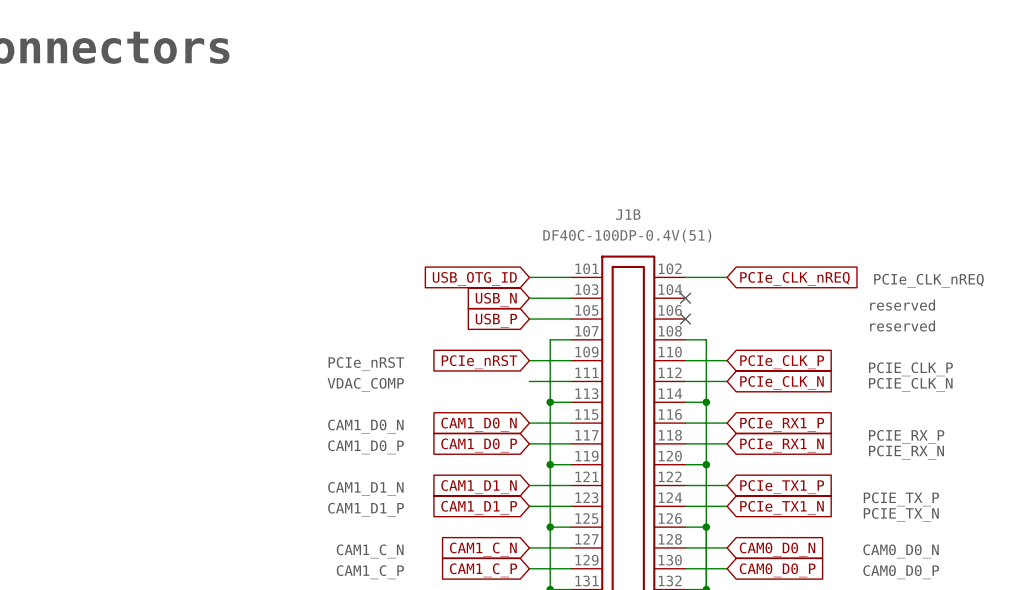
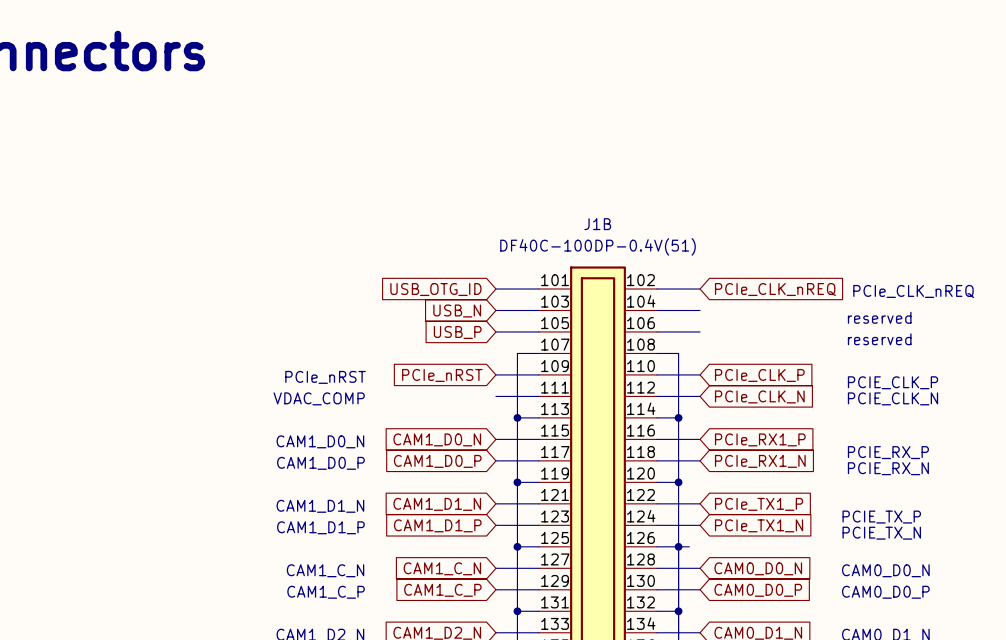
wire: none -> (657, 310) (700, 310)
no-connect mark: (685, 298) -> none
wire: none -> (657, 331) (700, 331)
no-connect mark: (685, 319) -> none
line: none -> (678, 546) (689, 546)

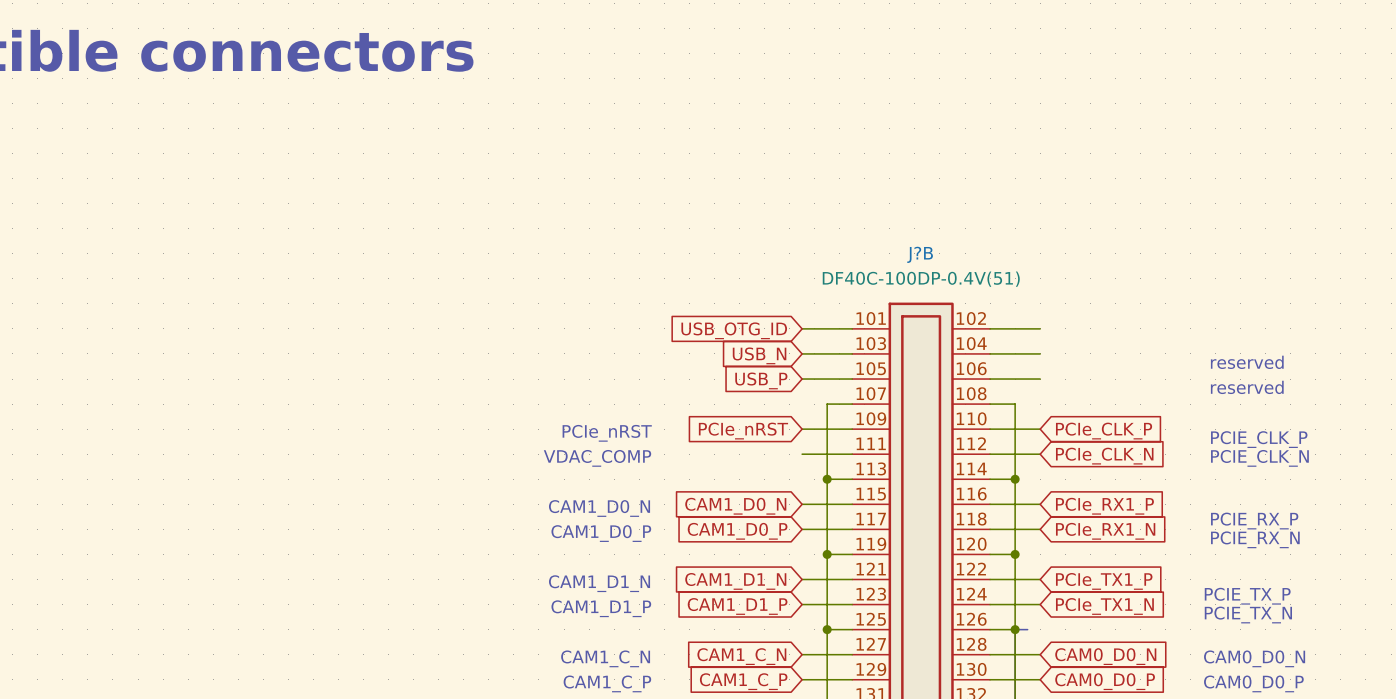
J1B name: J1B (597, 224) -> J?B (920, 254)
global label: PCIe_CLK_nREQ (775, 289) -> none
text: PCIe_CLK_nREQ (913, 291) -> none

